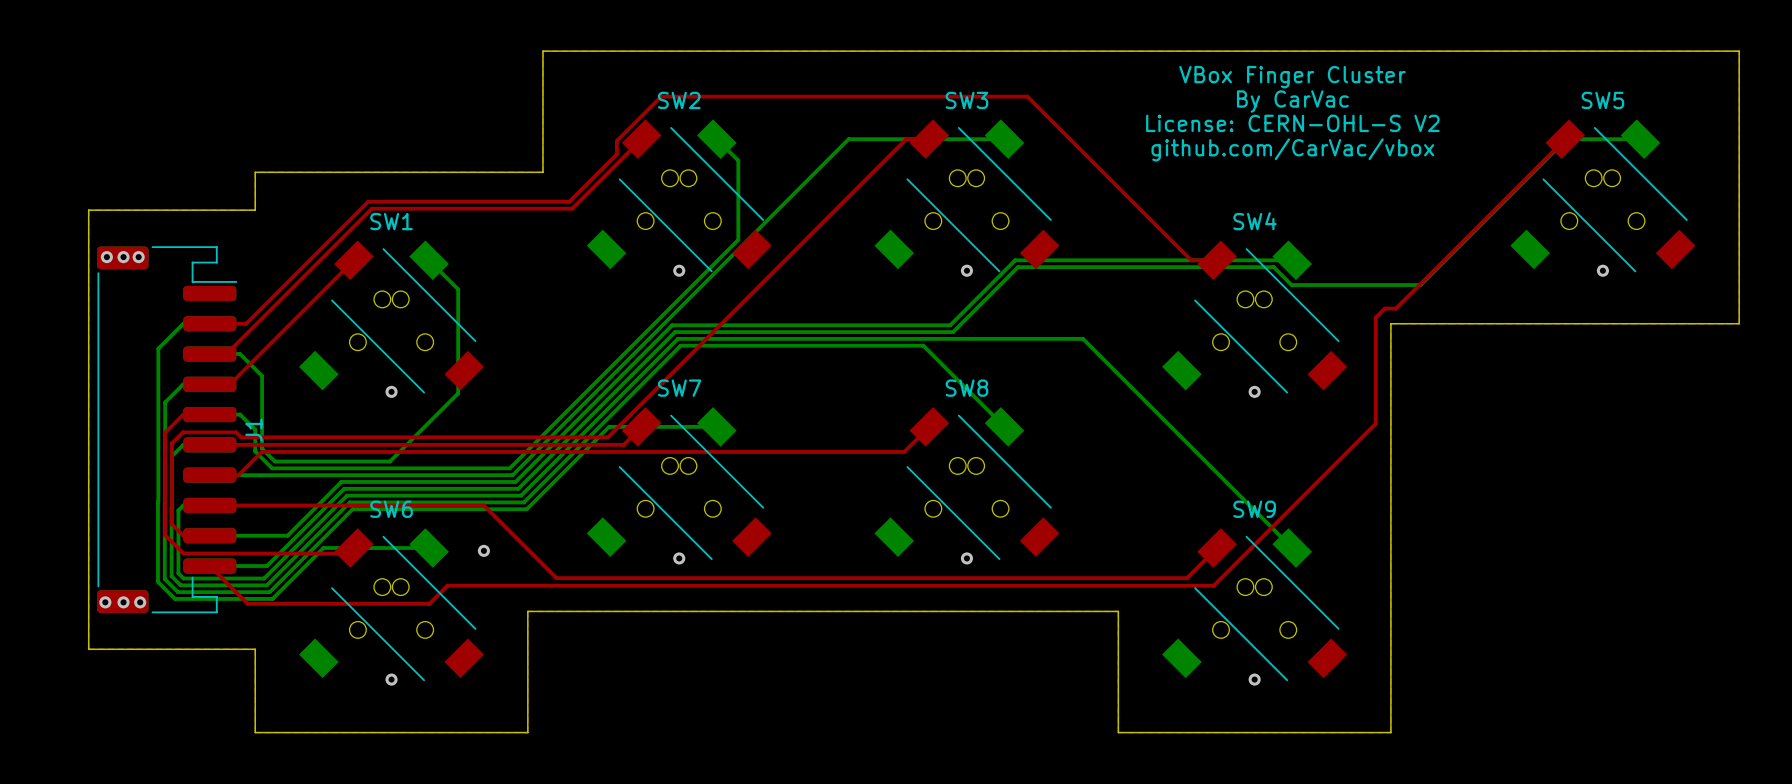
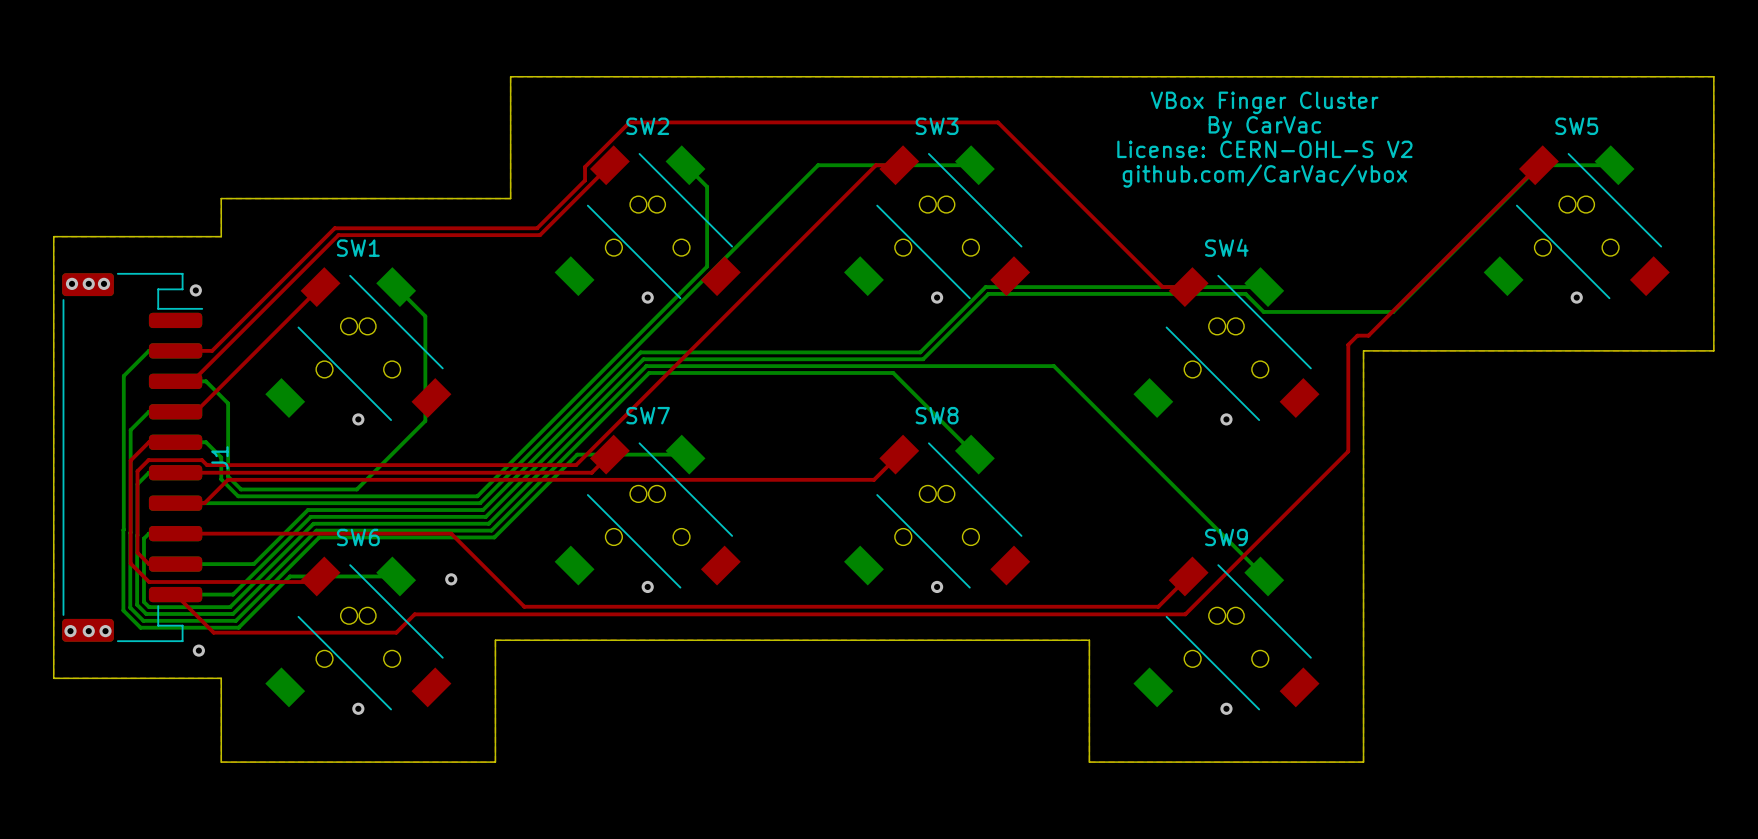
via: none -> (195, 290)
via: none -> (198, 650)

